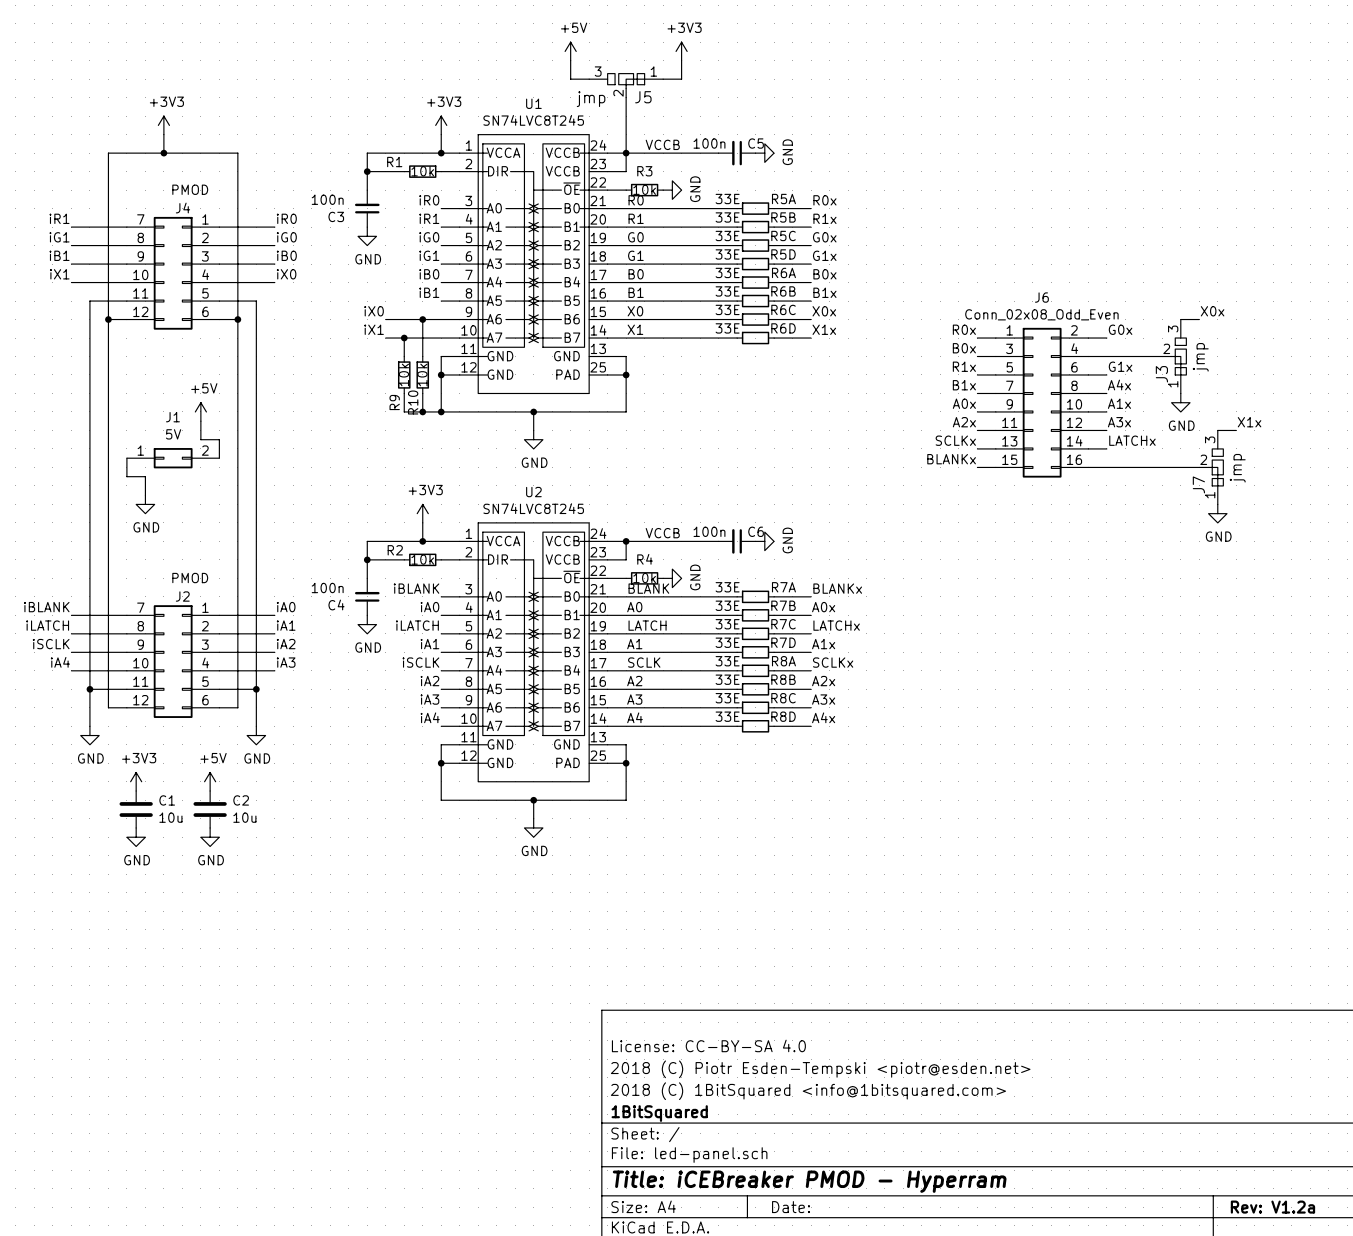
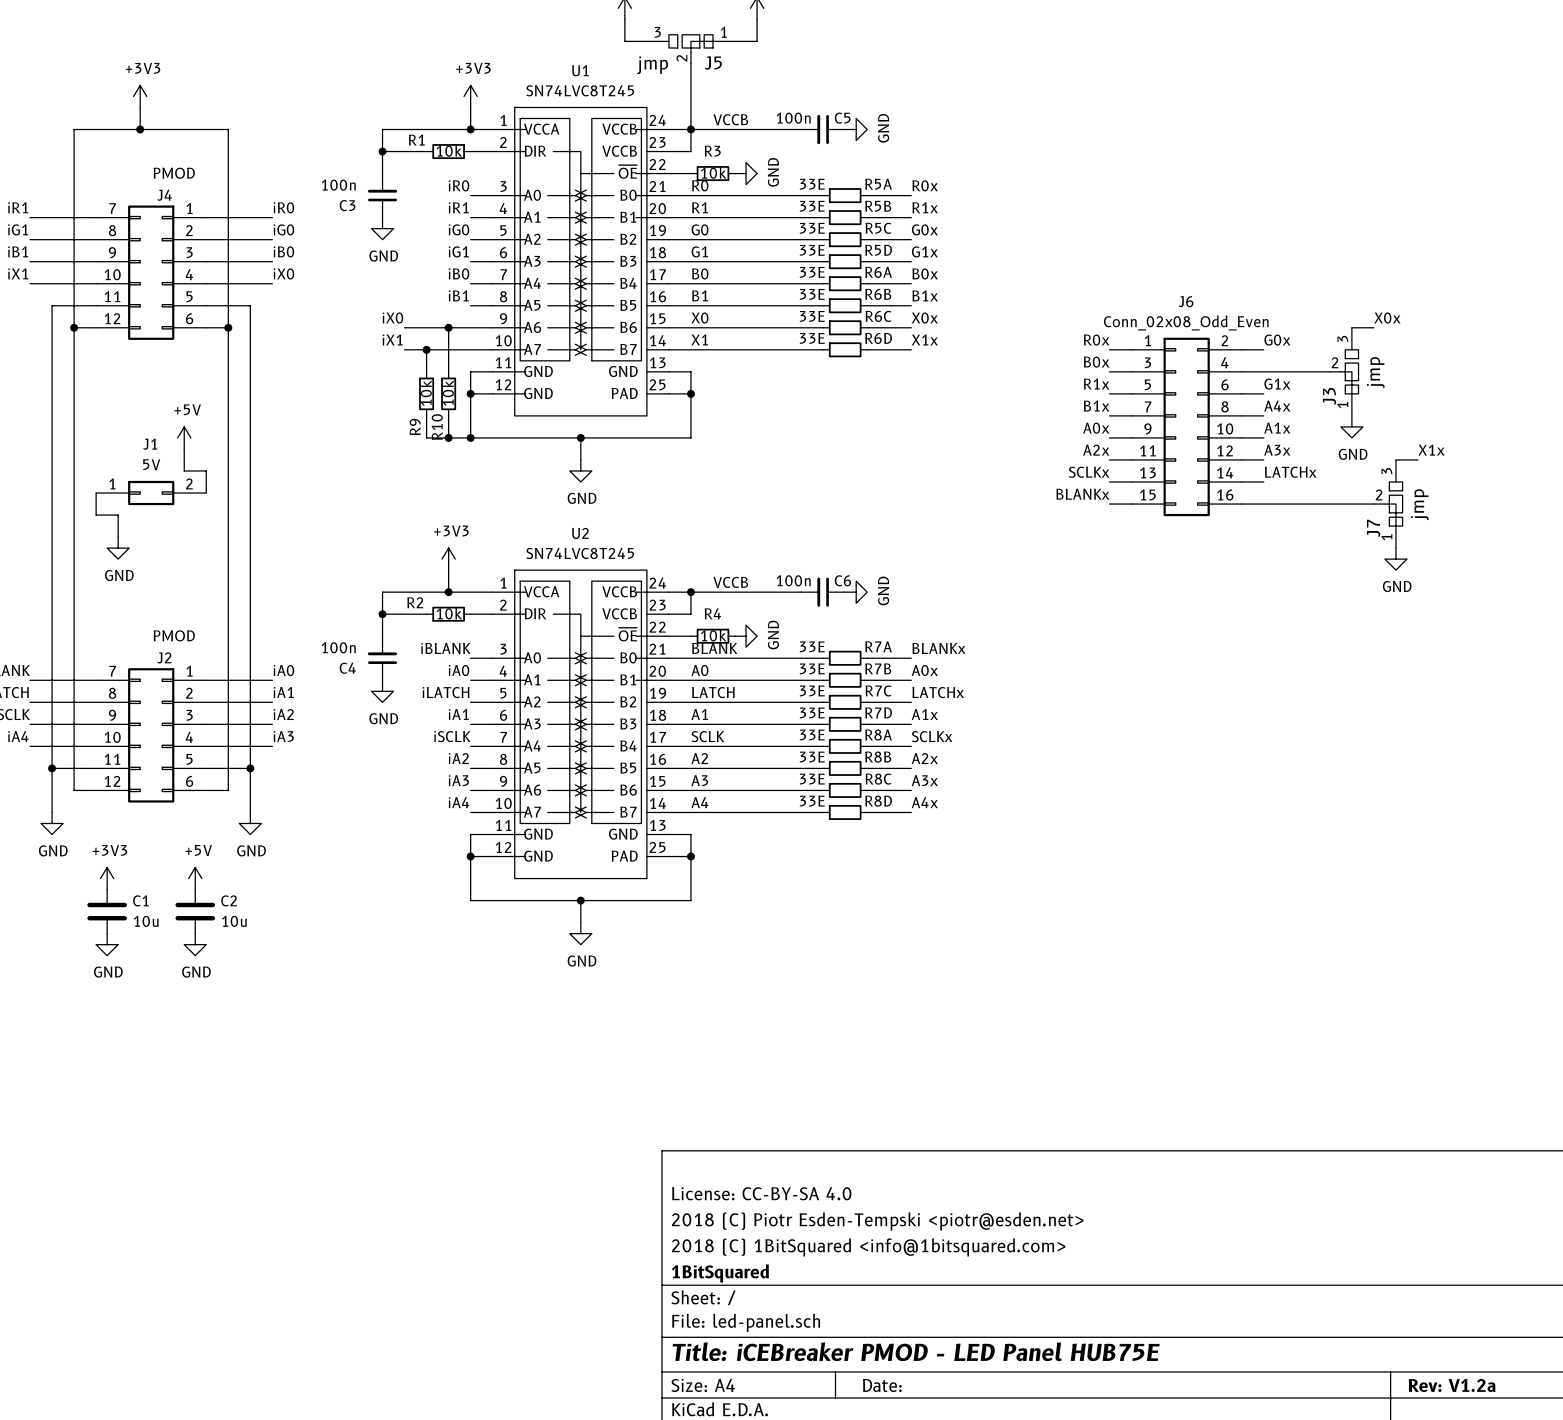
title block: Title: iCEBreaker PMOD - Hyperram (809, 1181) -> Title: iCEBreaker PMOD - LED Panel HUB75E (916, 1351)

